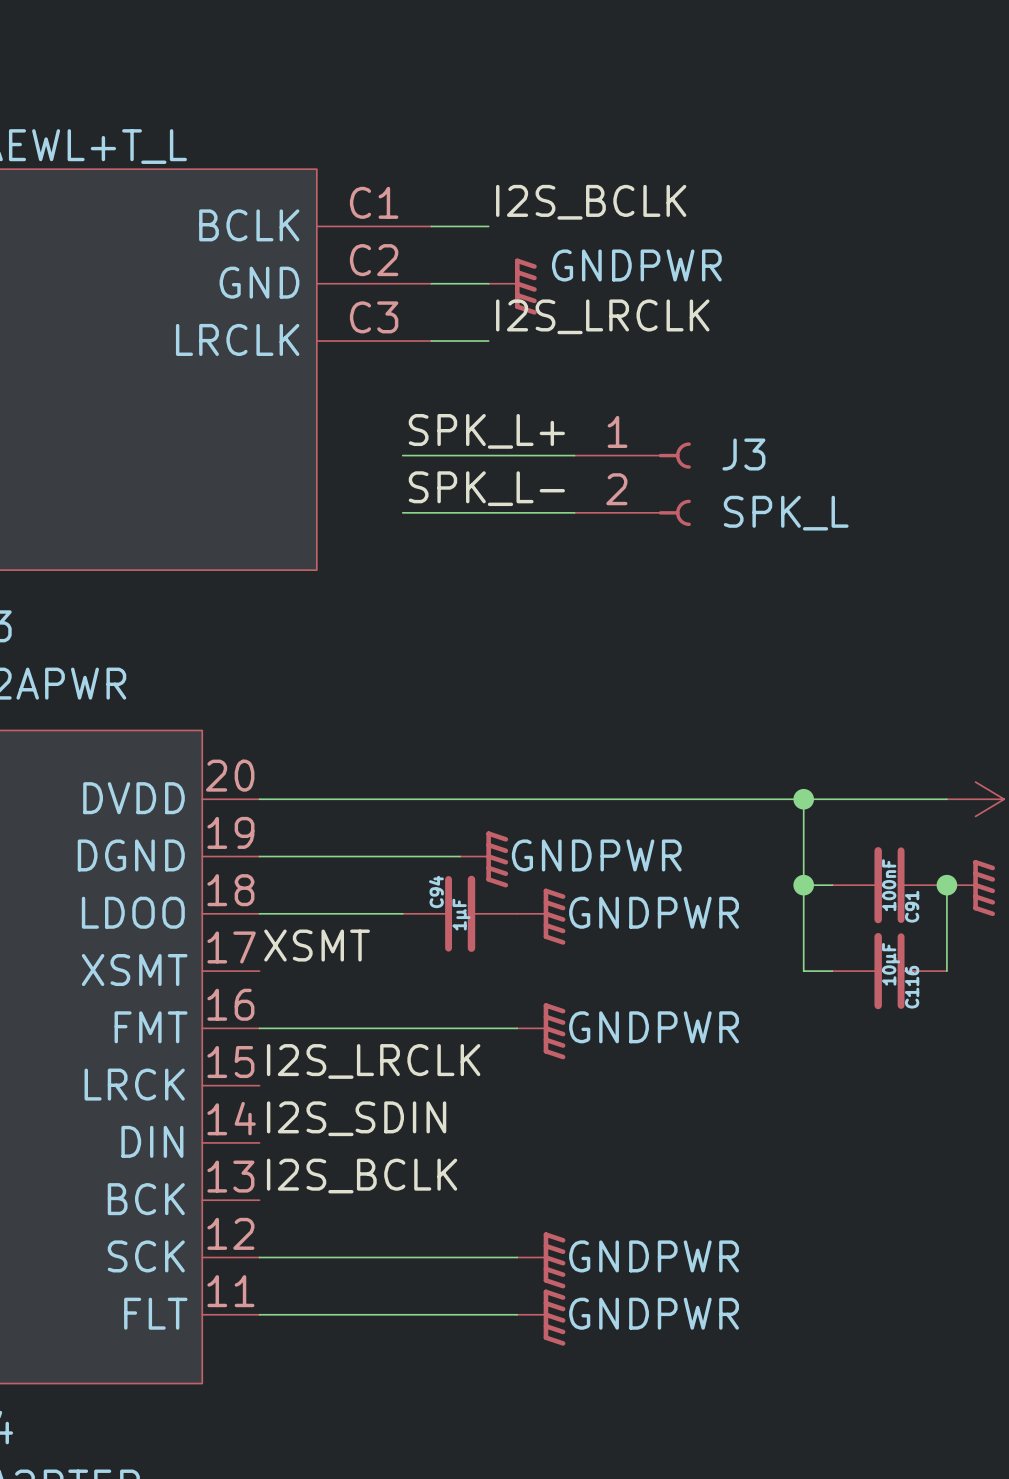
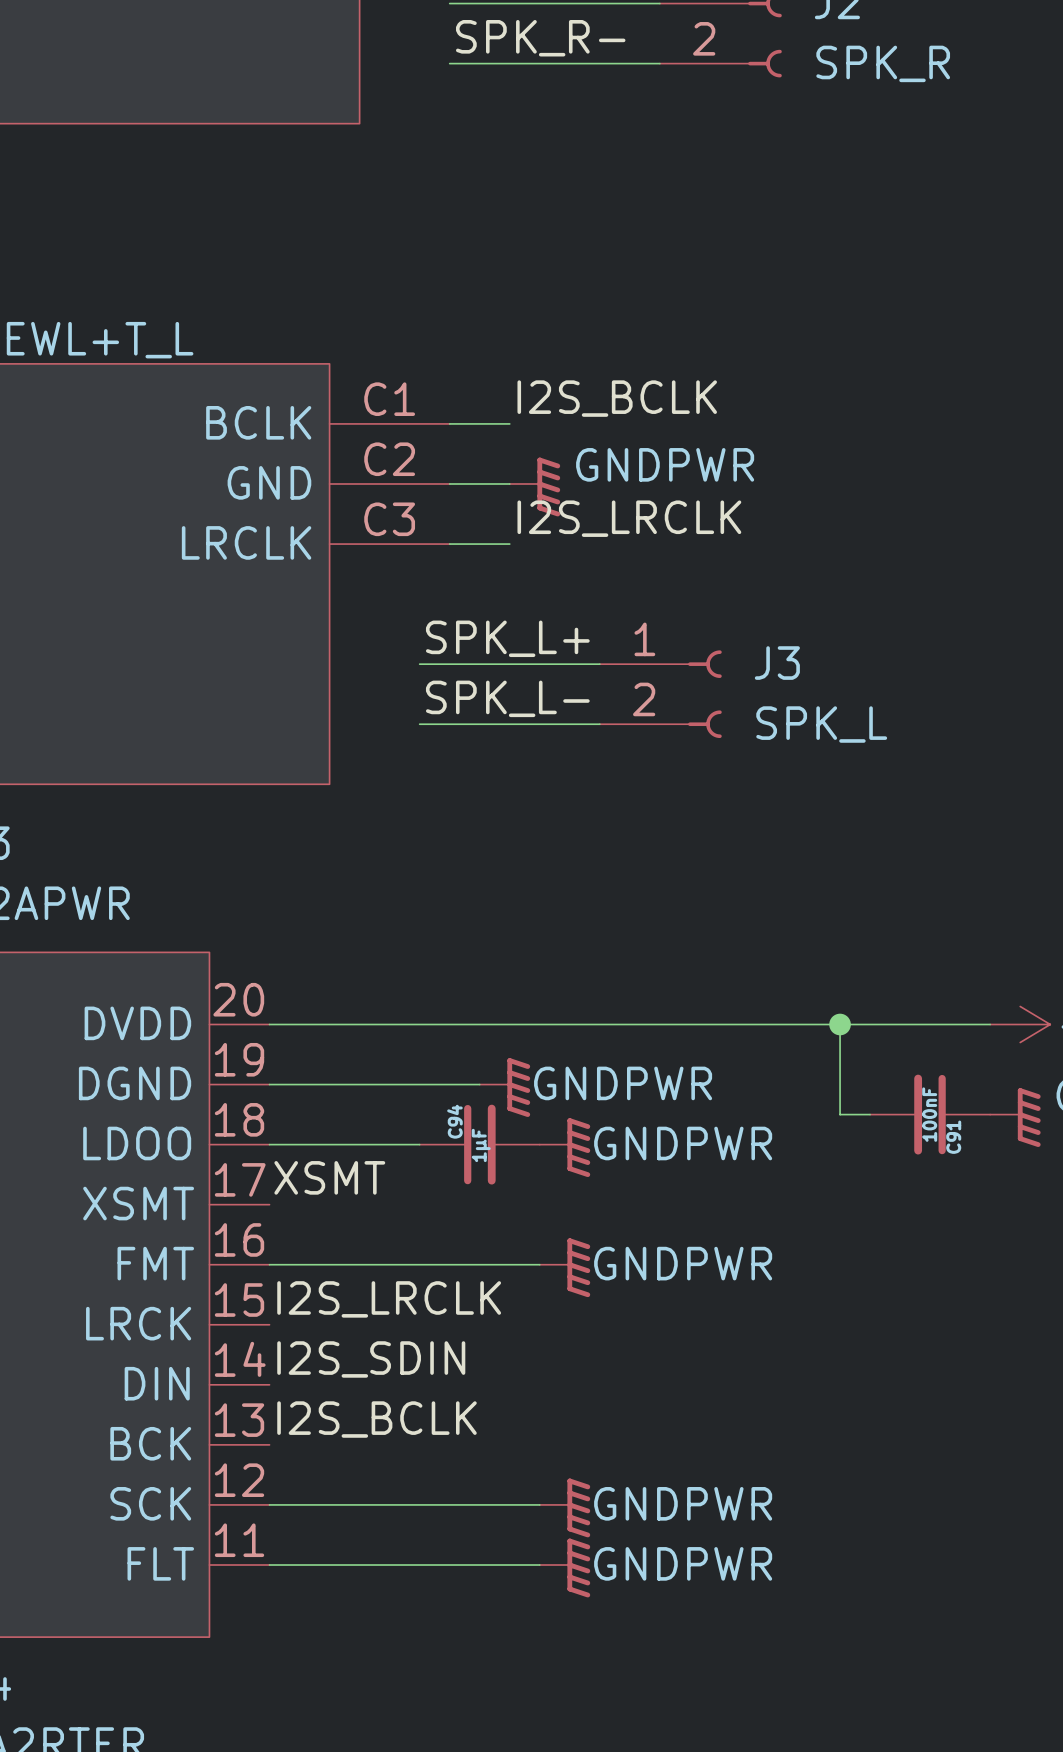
wire: (803, 885) (803, 971) (832, 971) -> none
junction: (803, 885) -> none
wire: (946, 885) (946, 971) -> none
junction: (946, 885) -> none
C116: 10μF (889, 971) -> none

